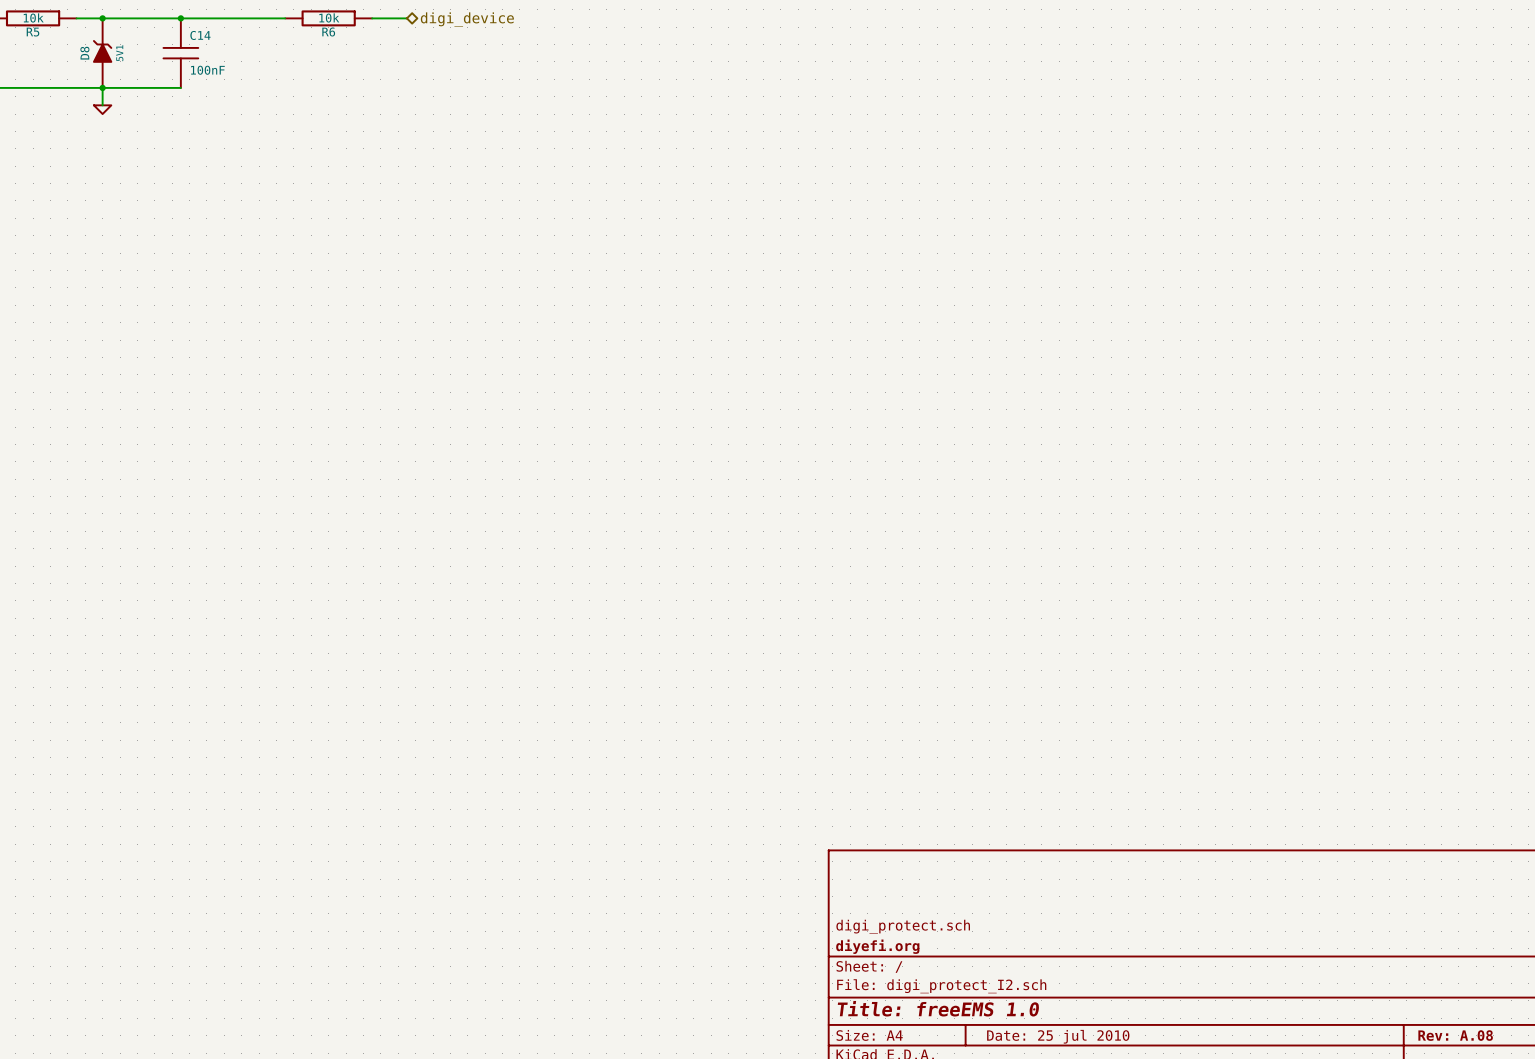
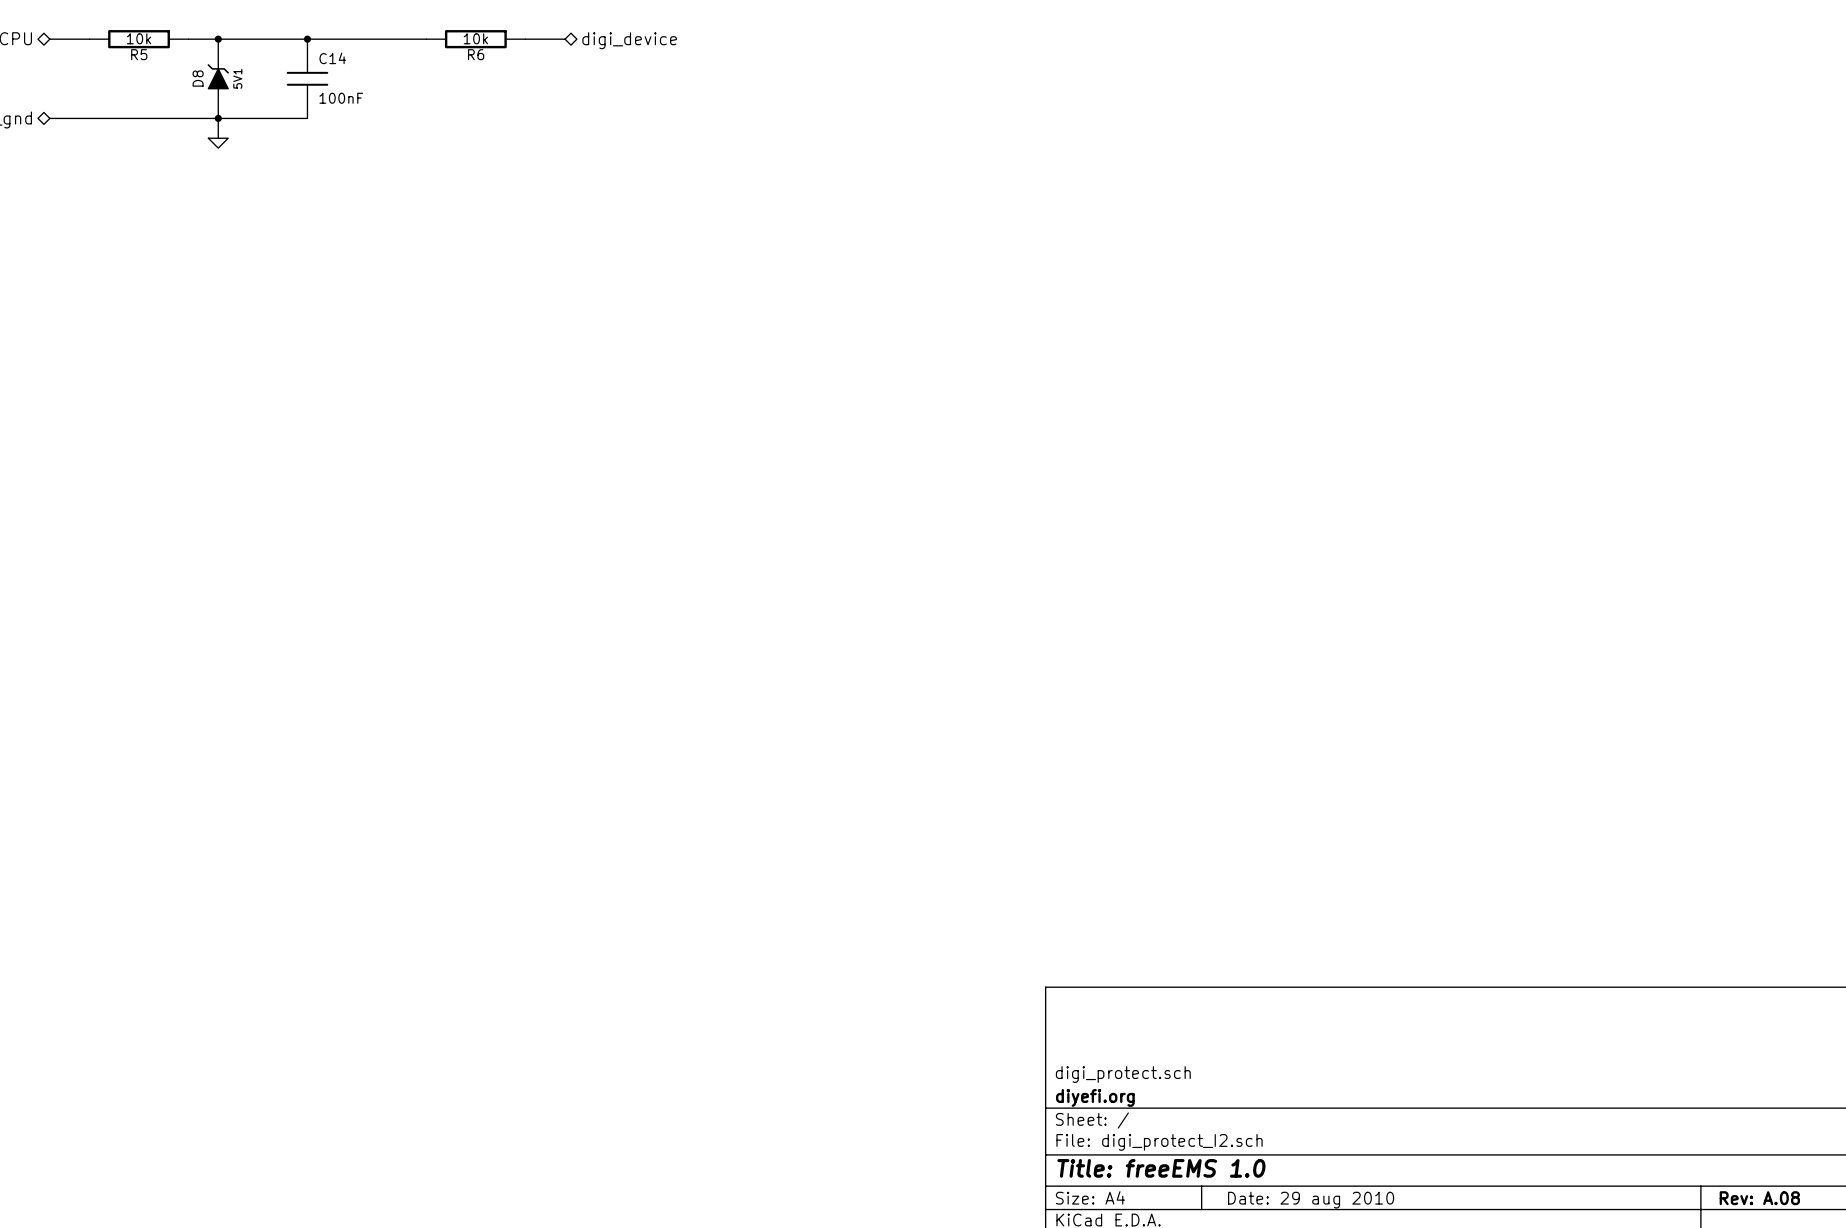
title block: Date: 25 jul 2010 (1058, 1036) -> Date: 29 aug 2010 (1311, 1200)

